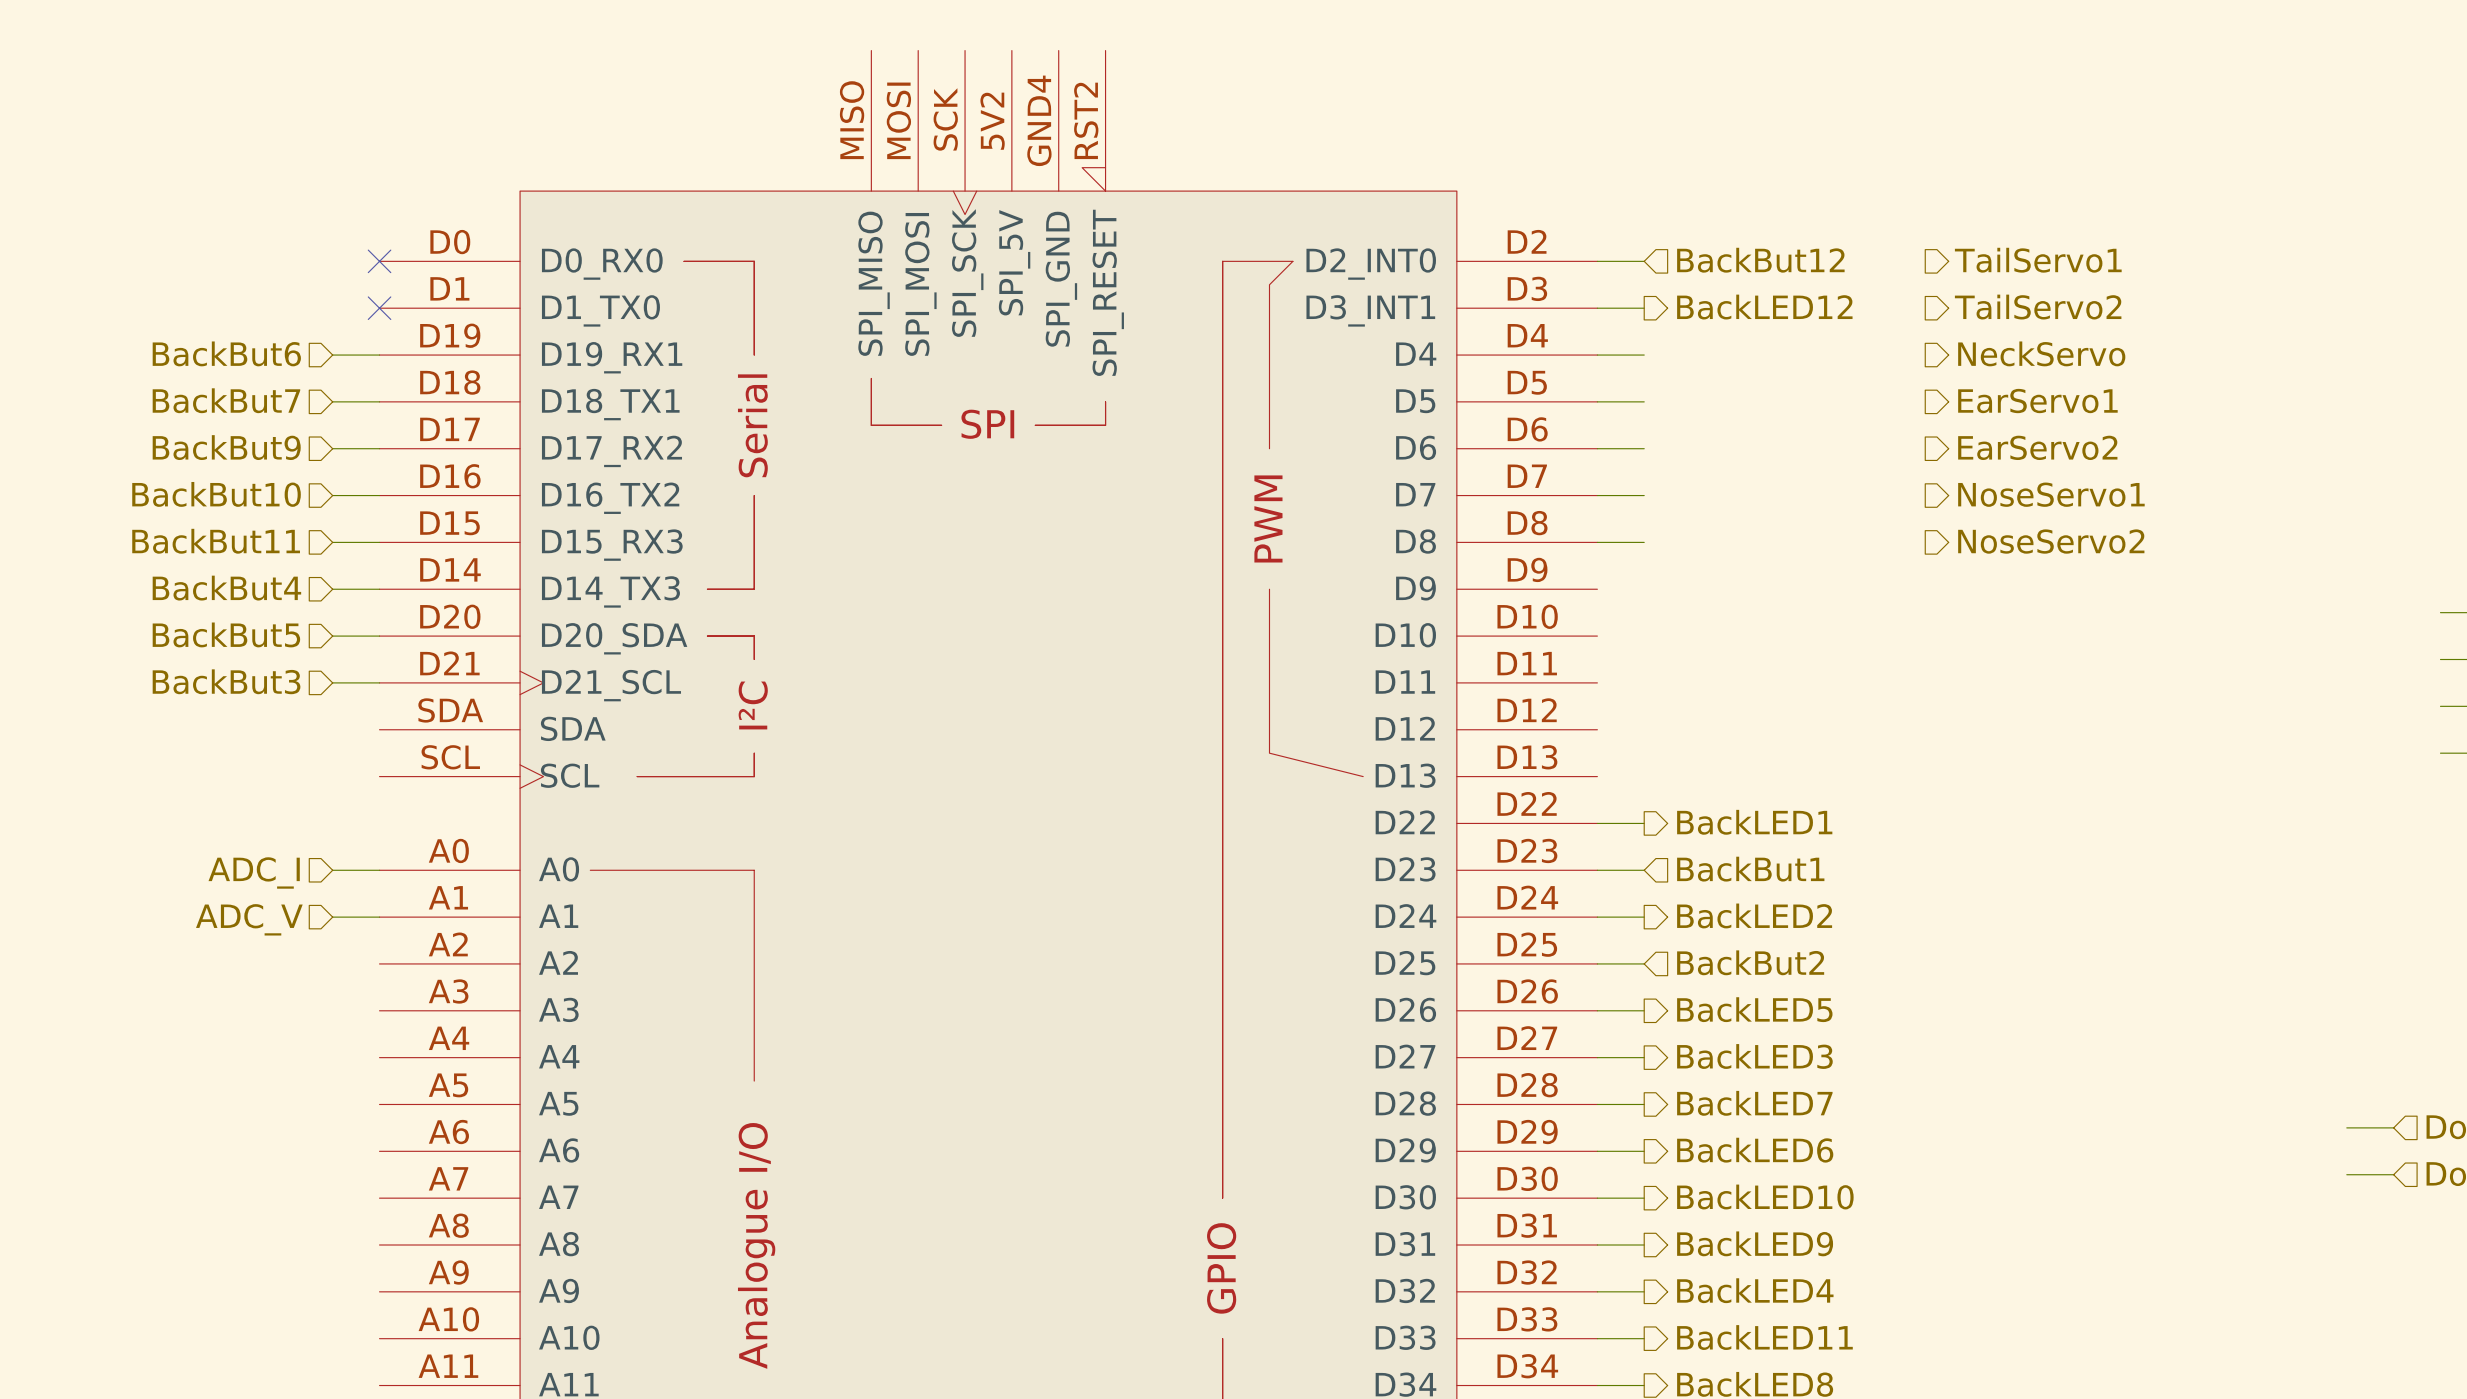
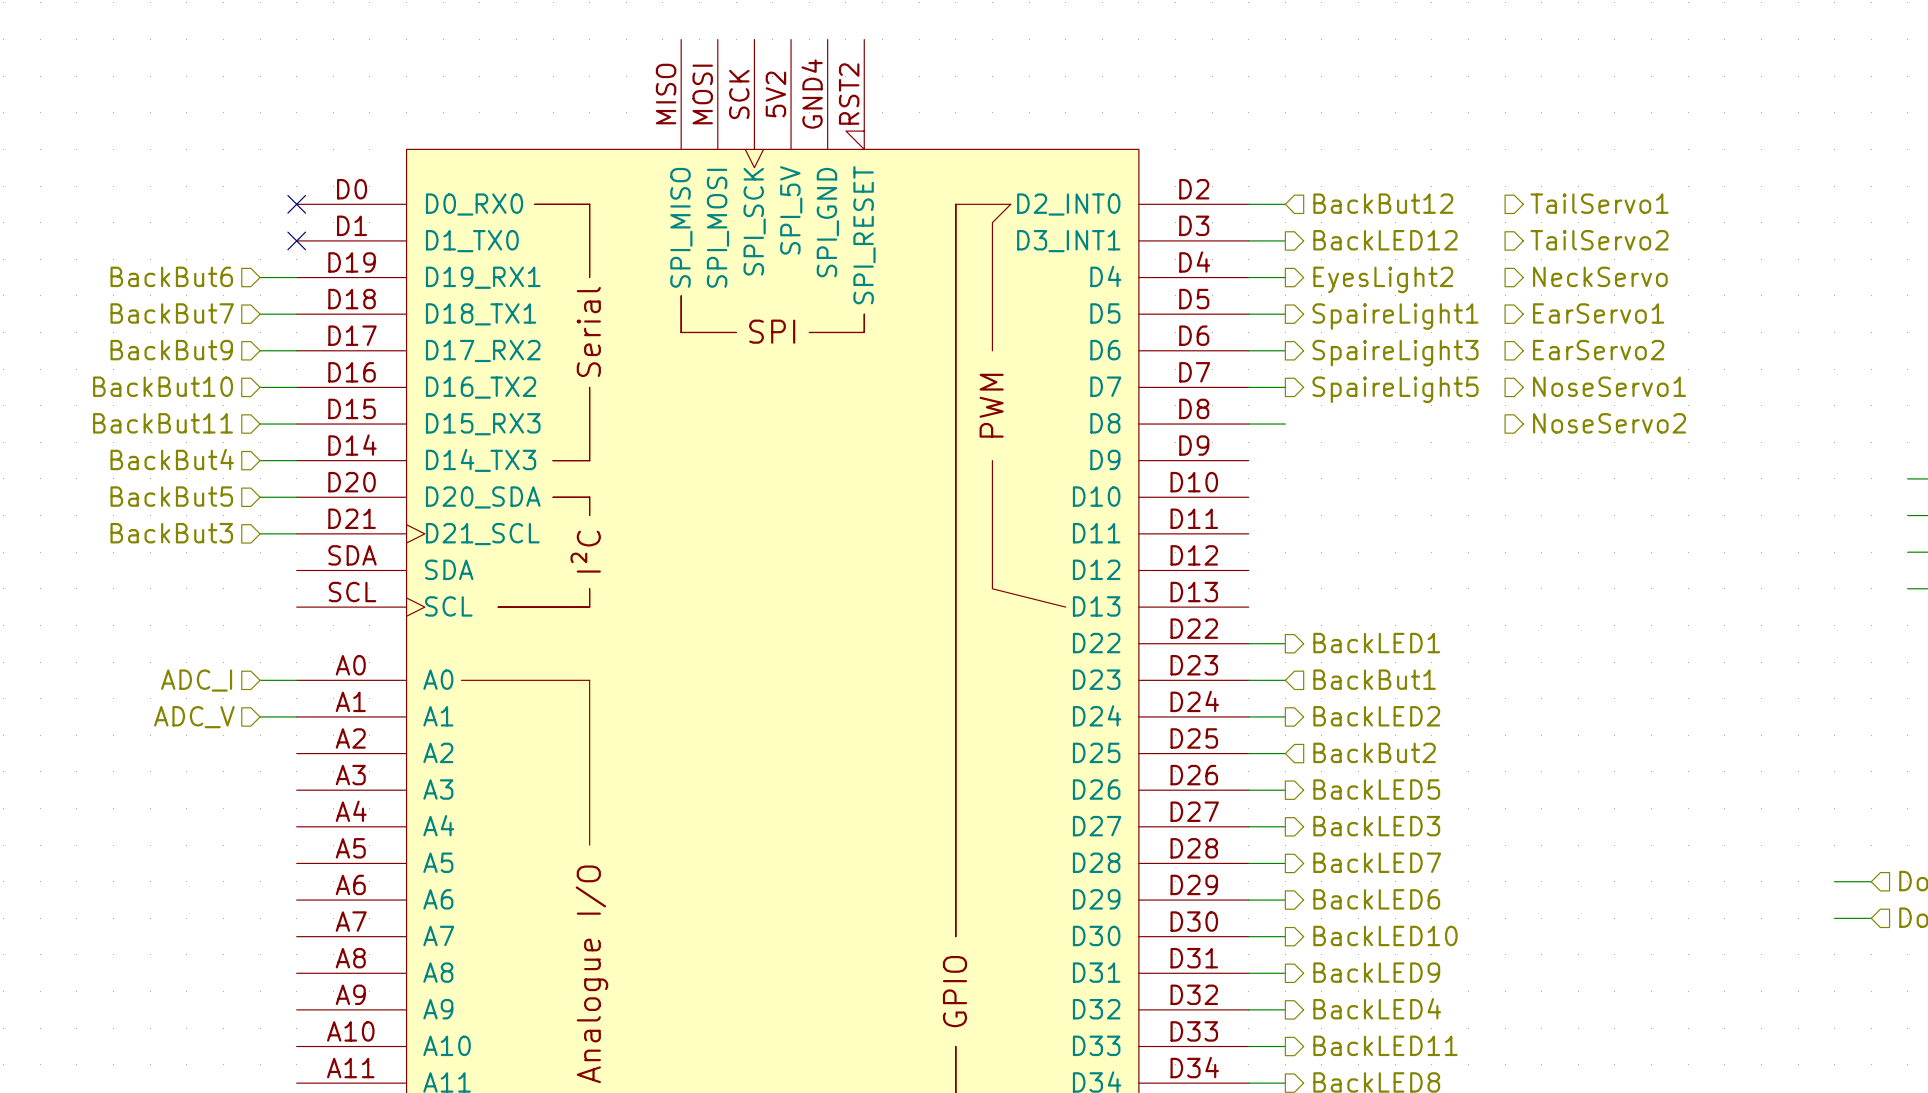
hierarchical label: none -> EyesLight2 (1383, 279)
hierarchical label: none -> SpaireLight1 (1395, 316)
hierarchical label: none -> SpaireLight3 (1395, 353)
hierarchical label: none -> SpaireLight5 (1395, 389)

